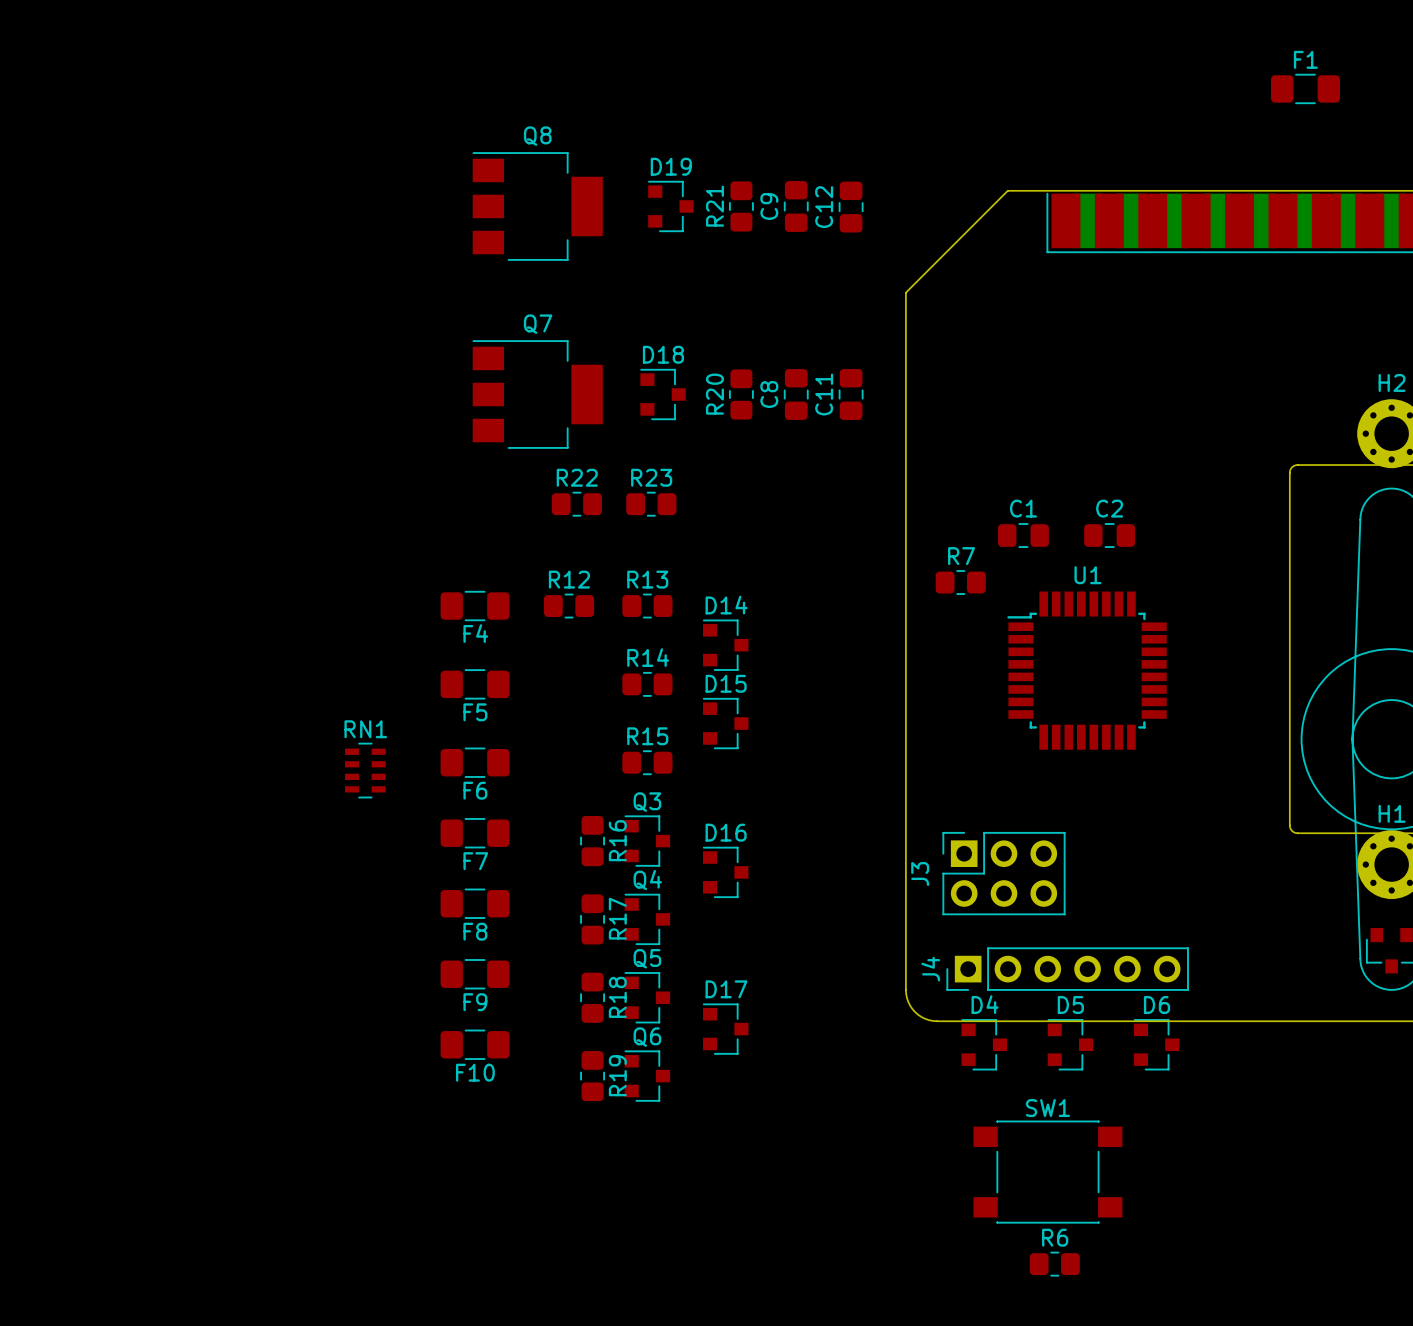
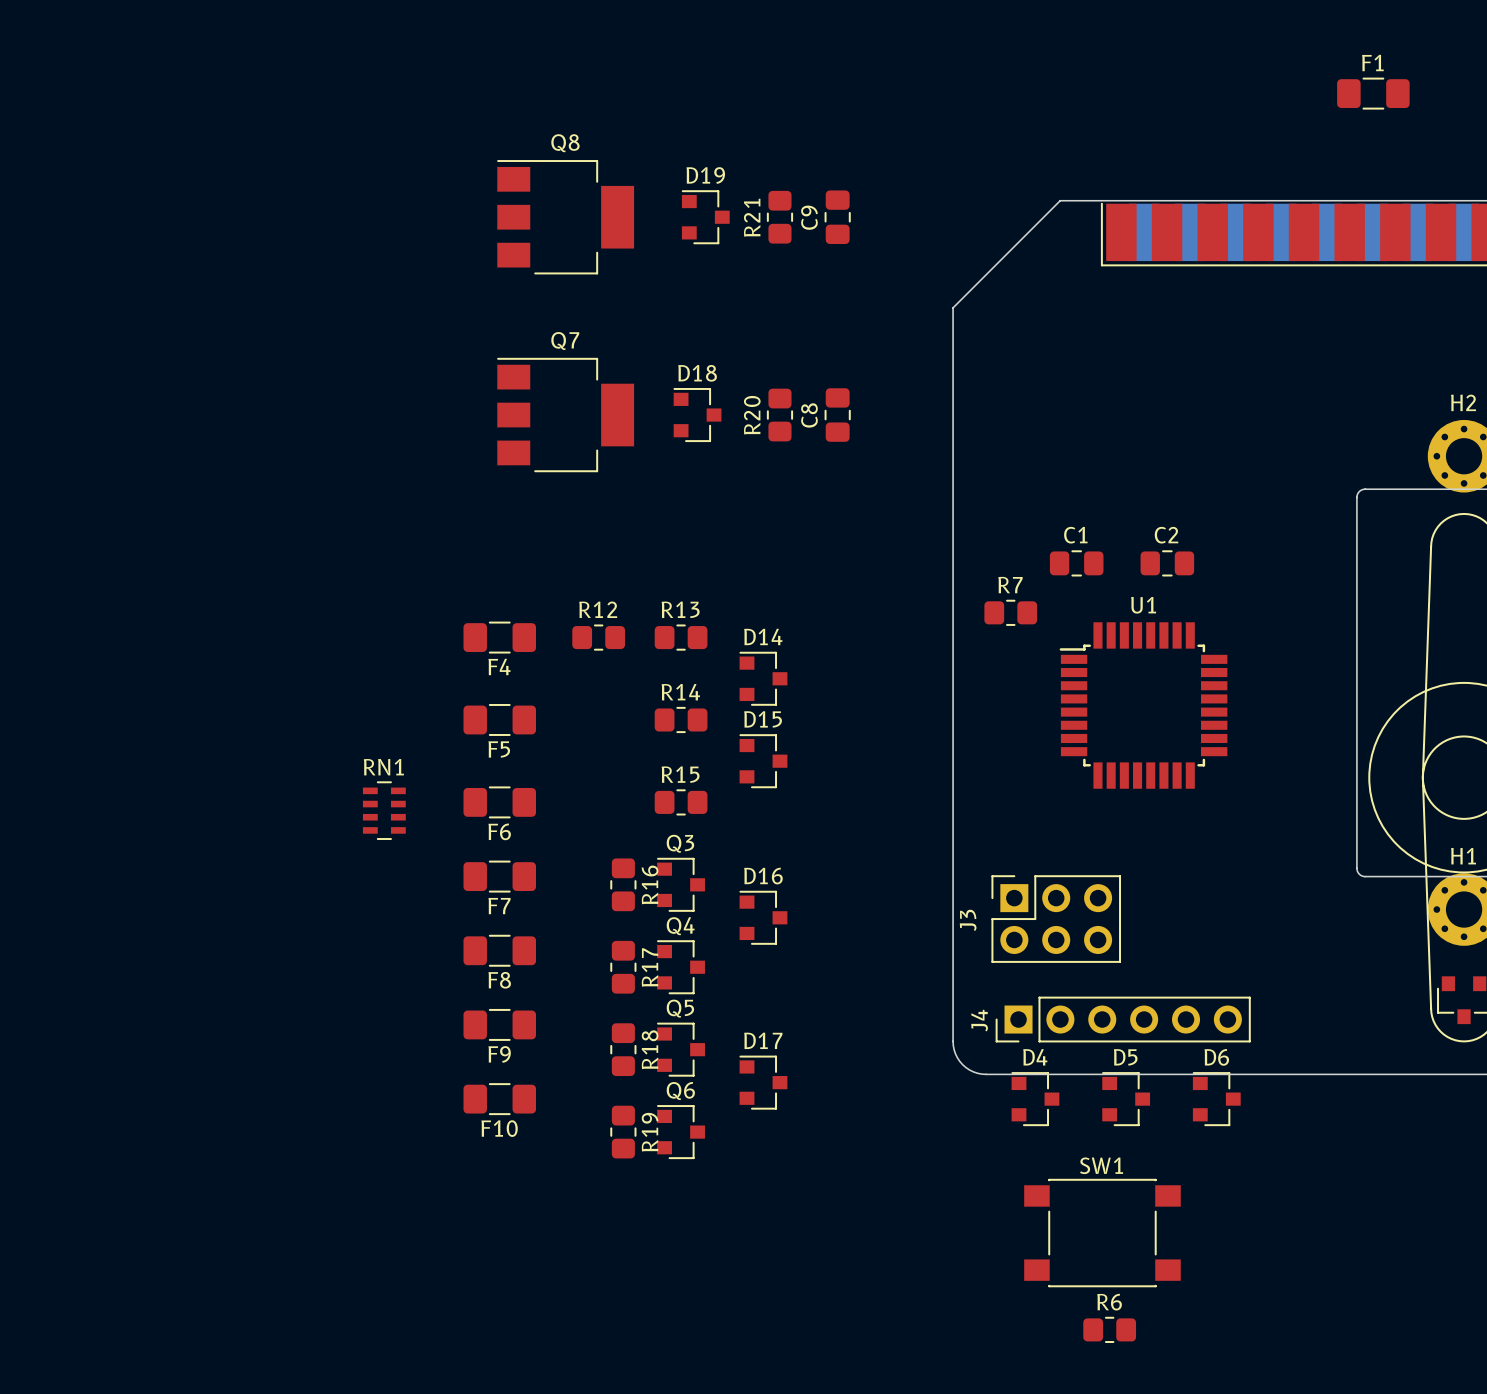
C12: (851, 207) -> none
C11: (851, 394) -> none
R22: (576, 504) -> none
R23: (651, 504) -> none

